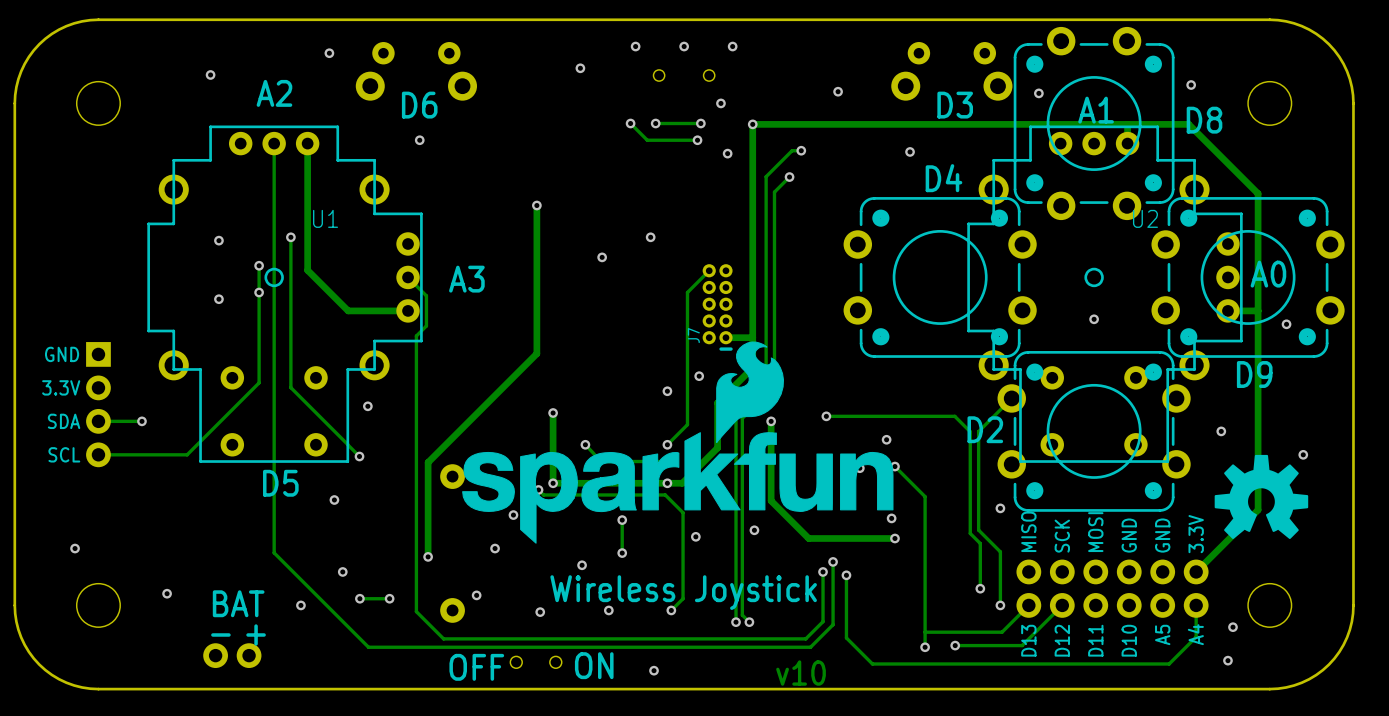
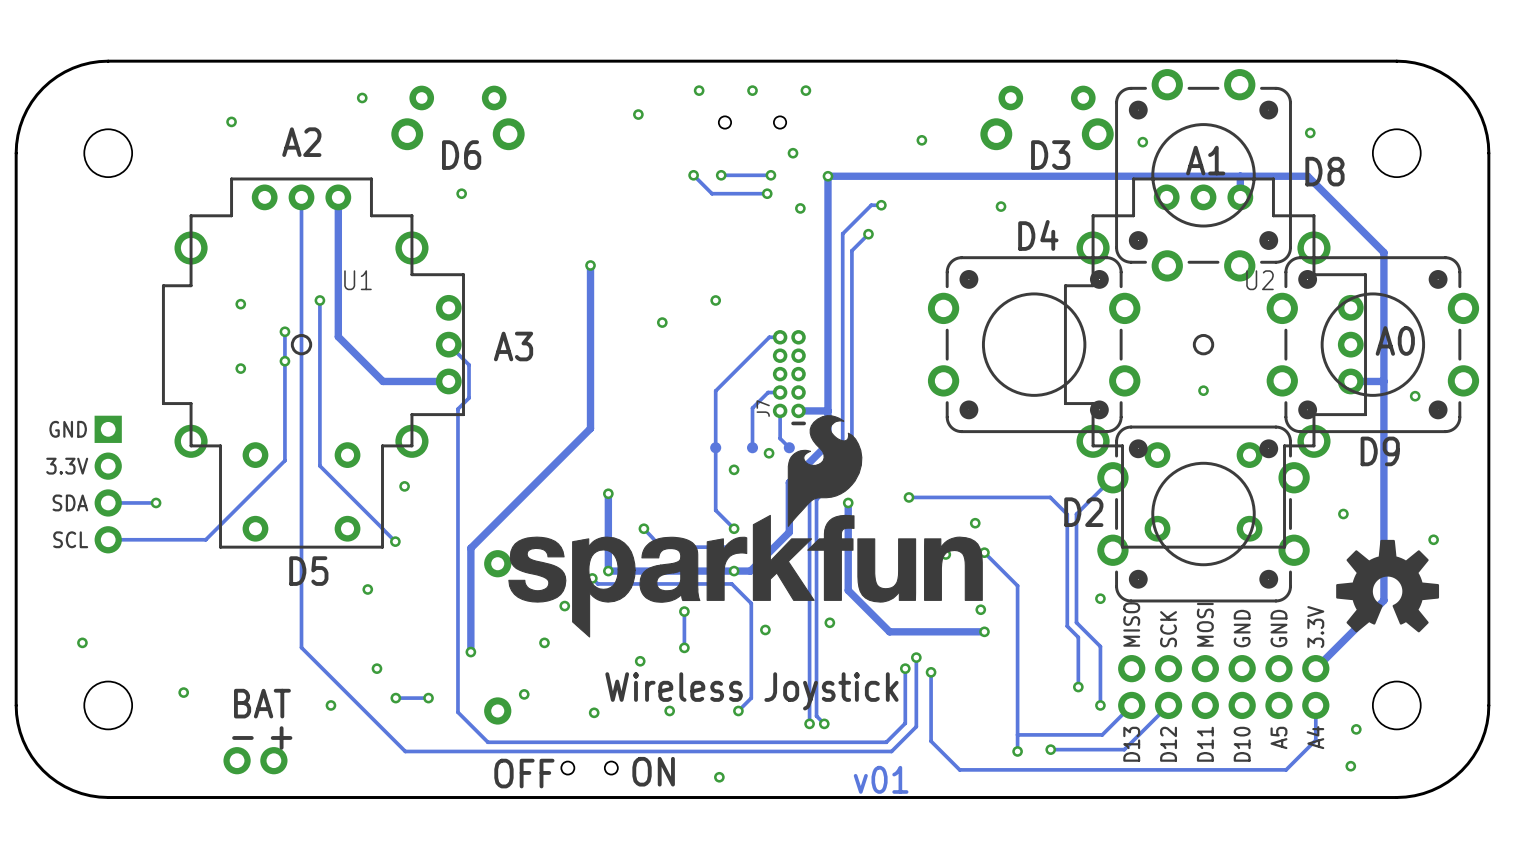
track: (709, 270) (687, 292) (687, 424) (667, 444) -> (780, 337) (769, 337) (715, 390) (715, 510) (734, 528)
track: none -> (780, 392) (768, 392) (752, 408) (752, 447)
track: none -> (780, 410) (780, 438) (789, 447)
part: none -> (715, 447)
part: none -> (752, 447)
part: none -> (789, 447)
text: v10 (801, 673) -> v01 (881, 779)

